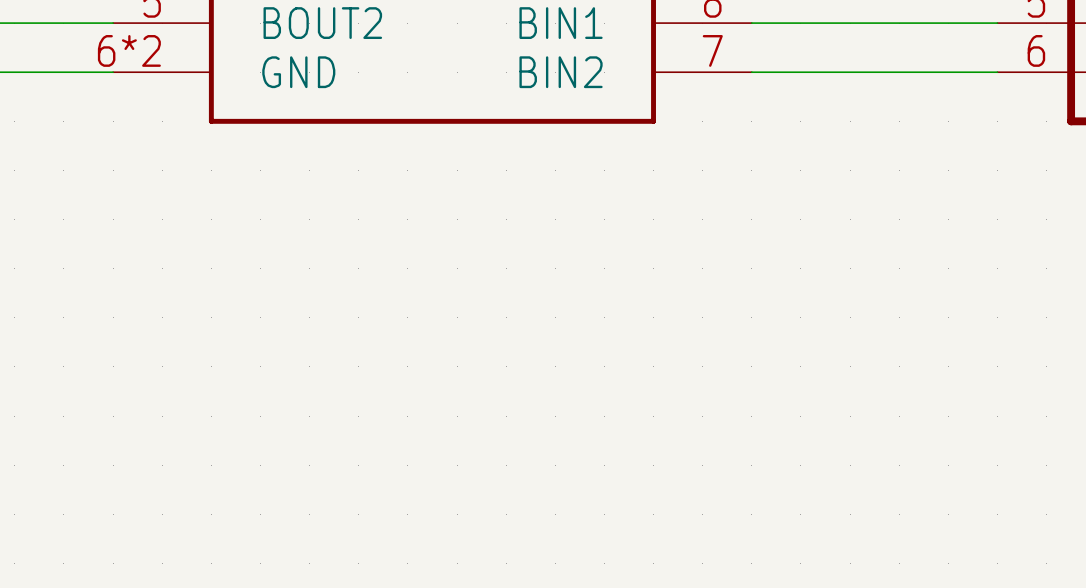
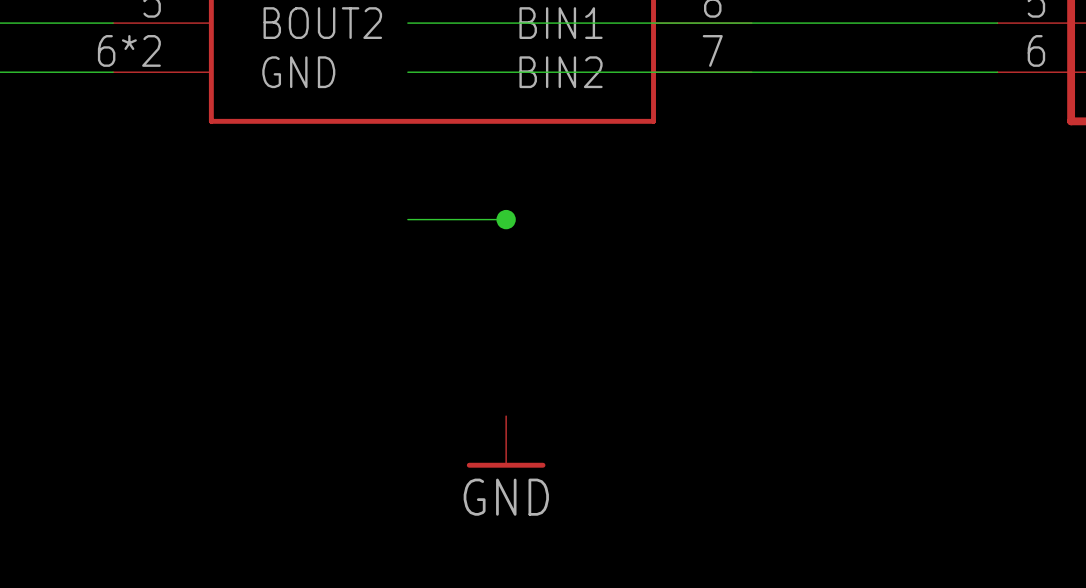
wire: none -> (407, 23) (751, 23)
wire: none -> (407, 72) (751, 72)
wire: none -> (407, 219) (506, 219)
junction: none -> (506, 219)
power symbol: none -> GND (506, 441)

